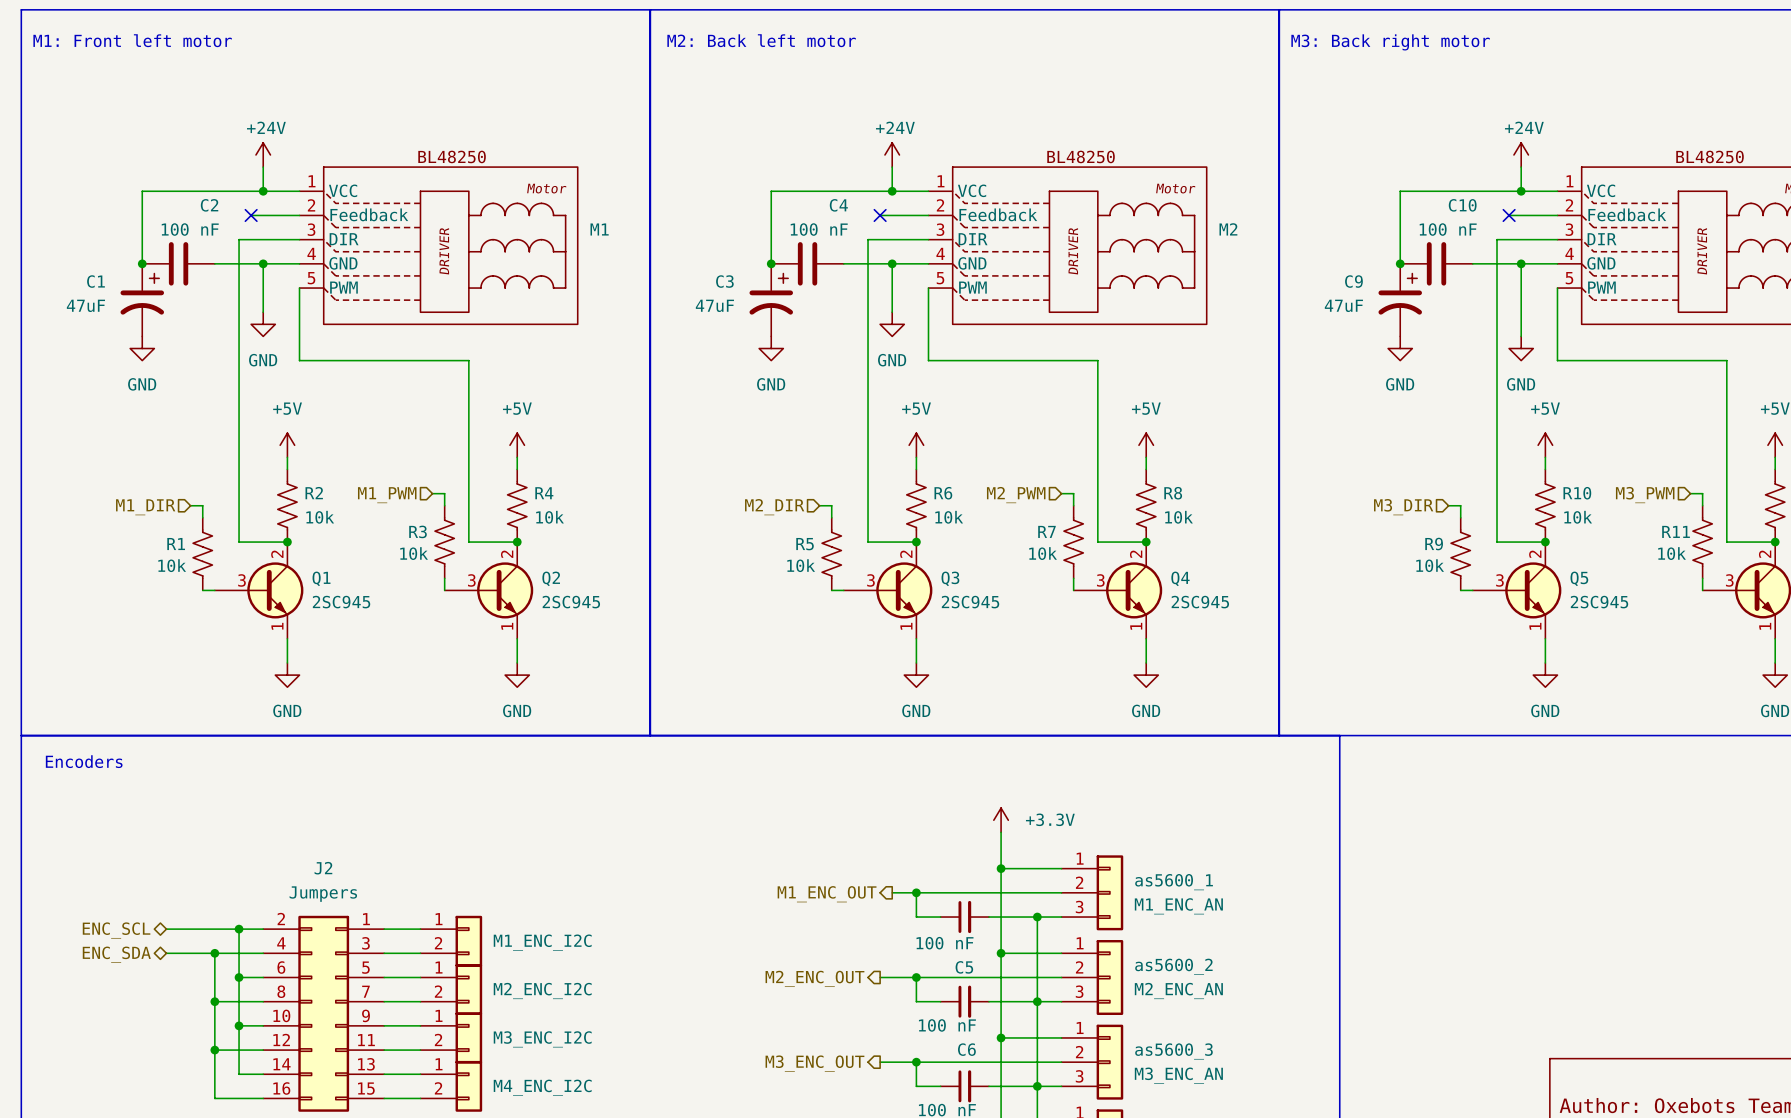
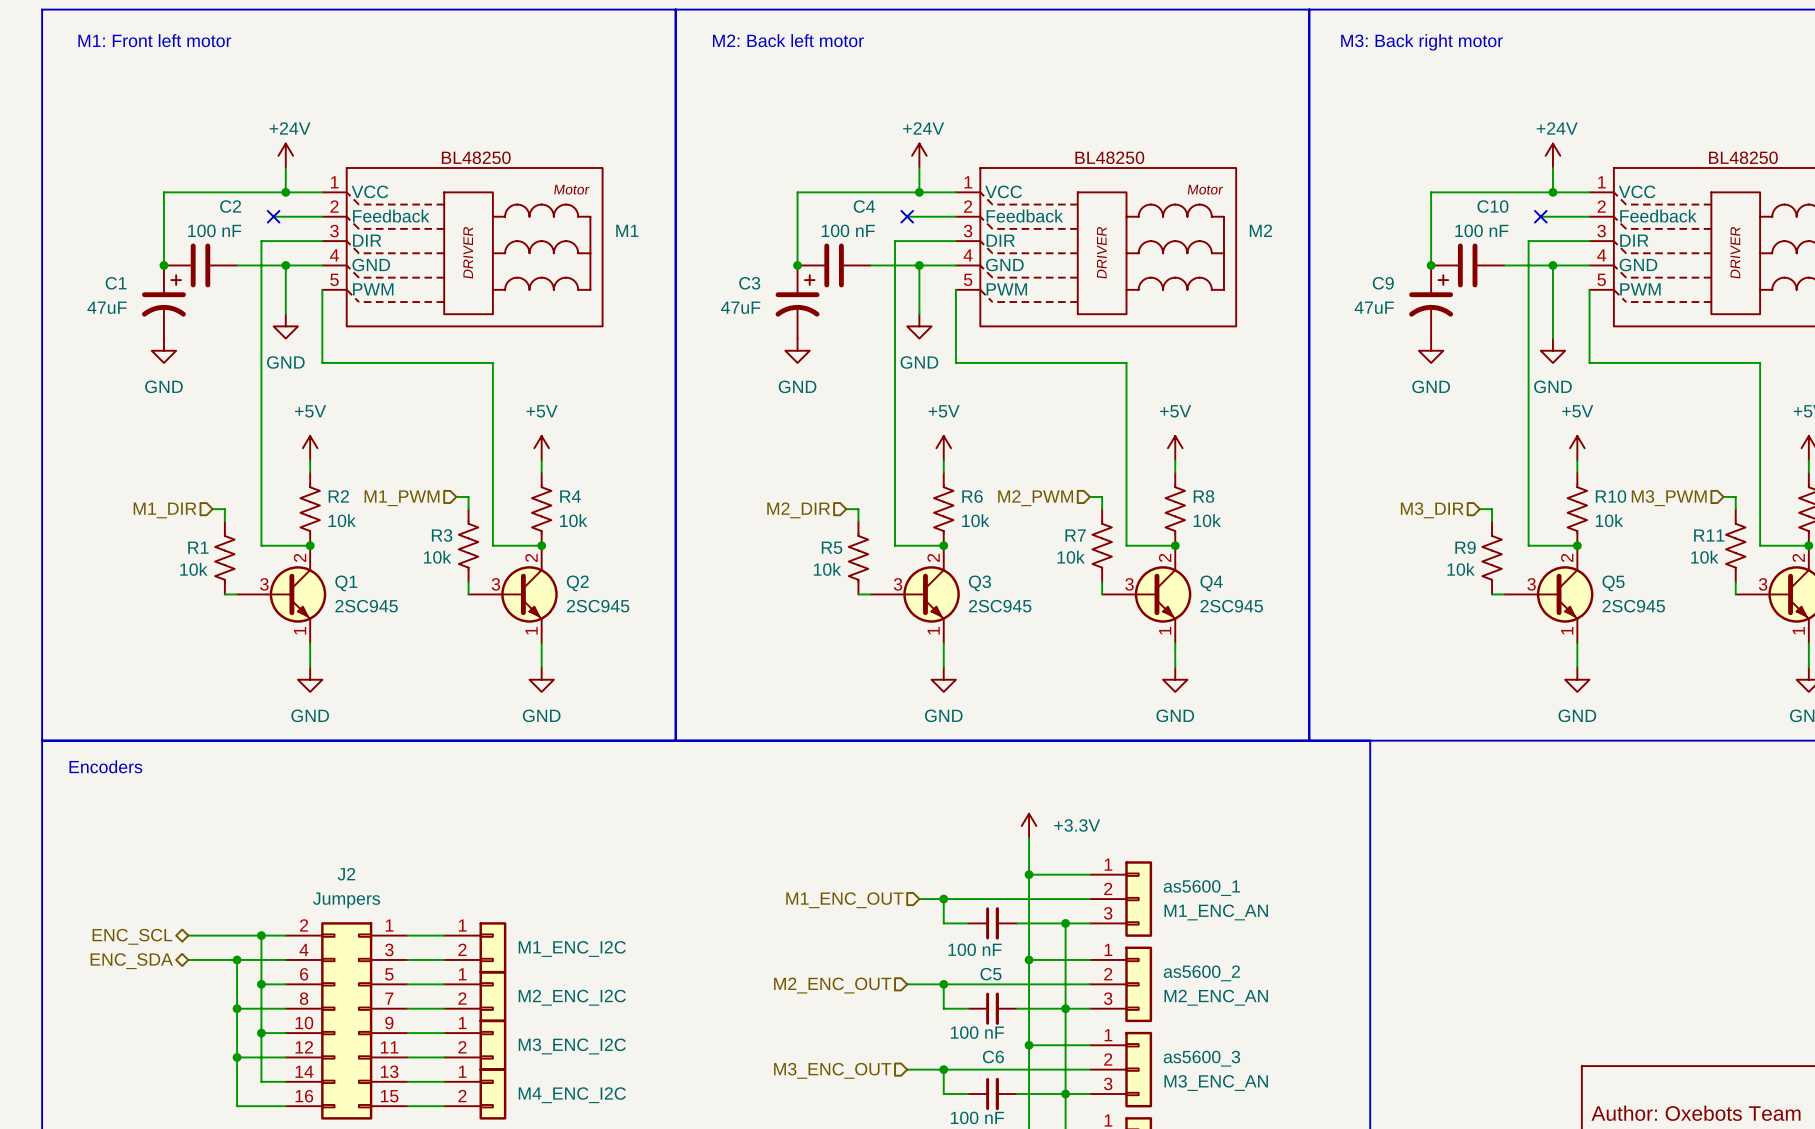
hierarchical label shape: output (827, 894) -> input (844, 900)
hierarchical label shape: output (814, 978) -> input (832, 985)
hierarchical label shape: output (814, 1063) -> input (832, 1070)

